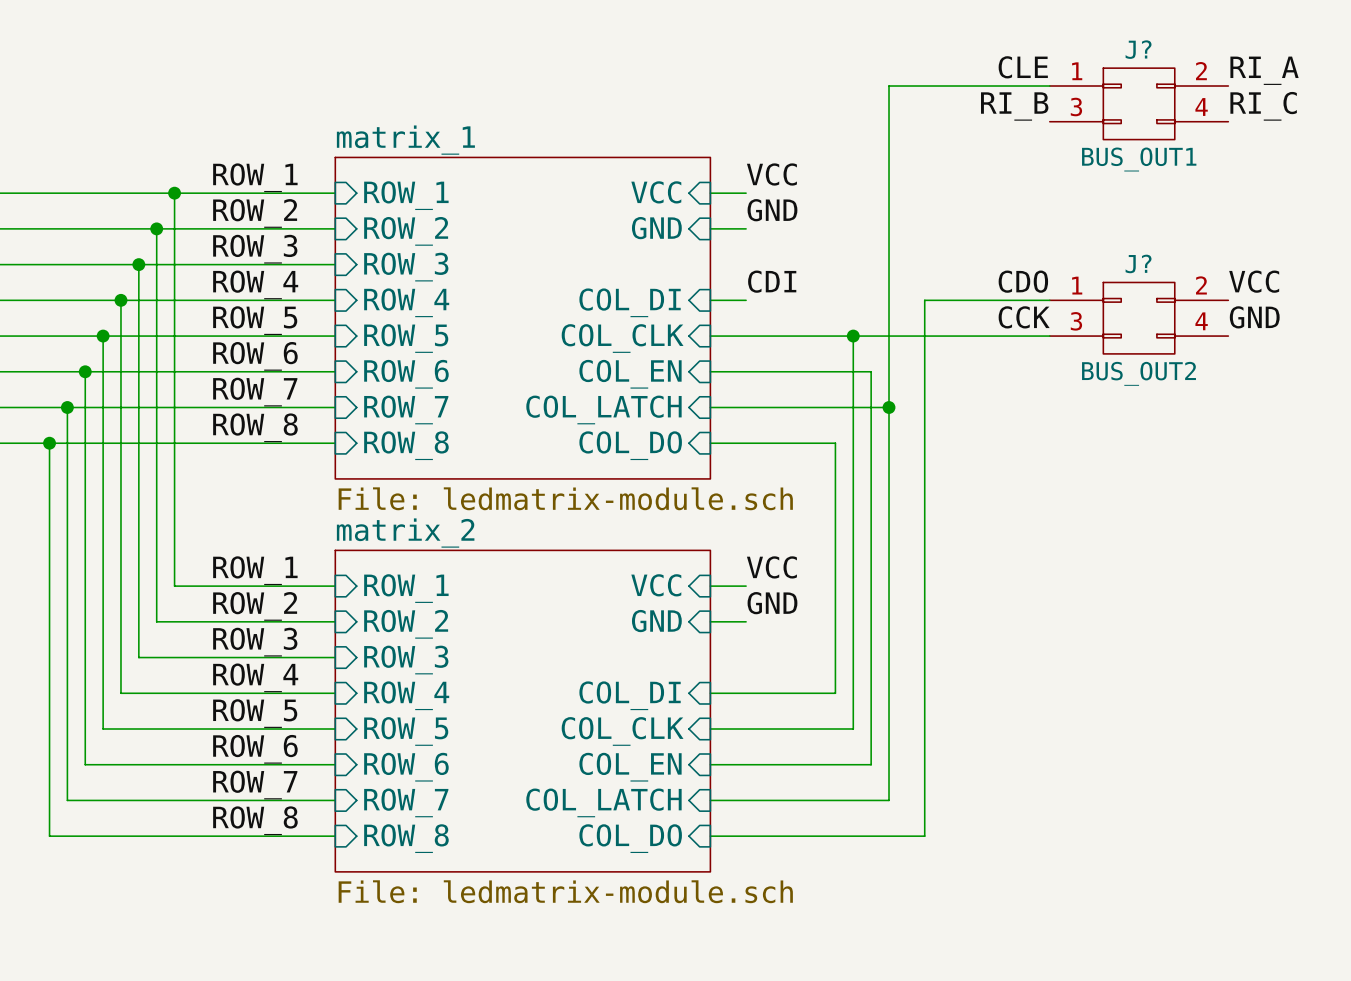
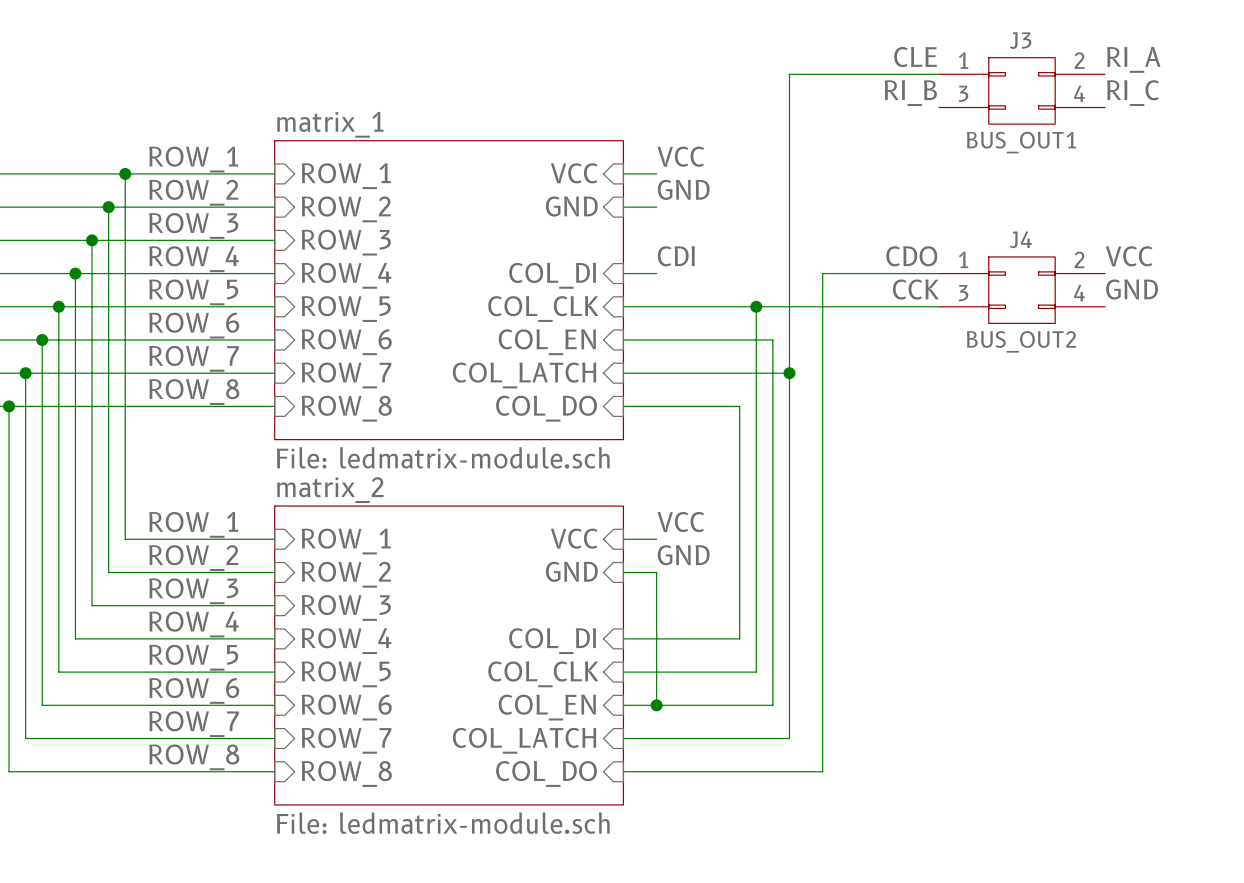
J? name: J? (1138, 49) -> J3 (1020, 40)
J? name: J? (1138, 263) -> J4 (1020, 239)
wire: none -> (656, 572) (656, 705)
junction: none -> (656, 705)

